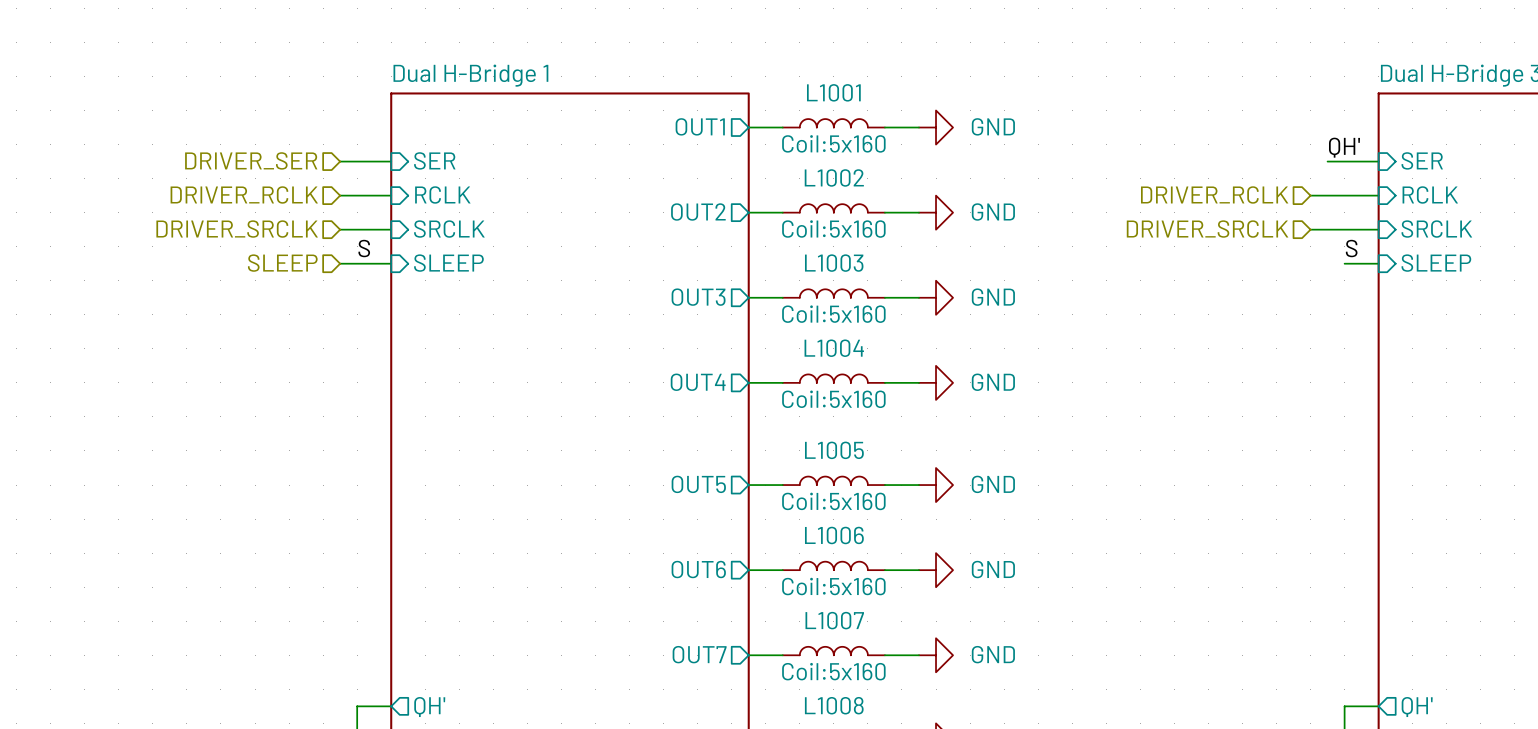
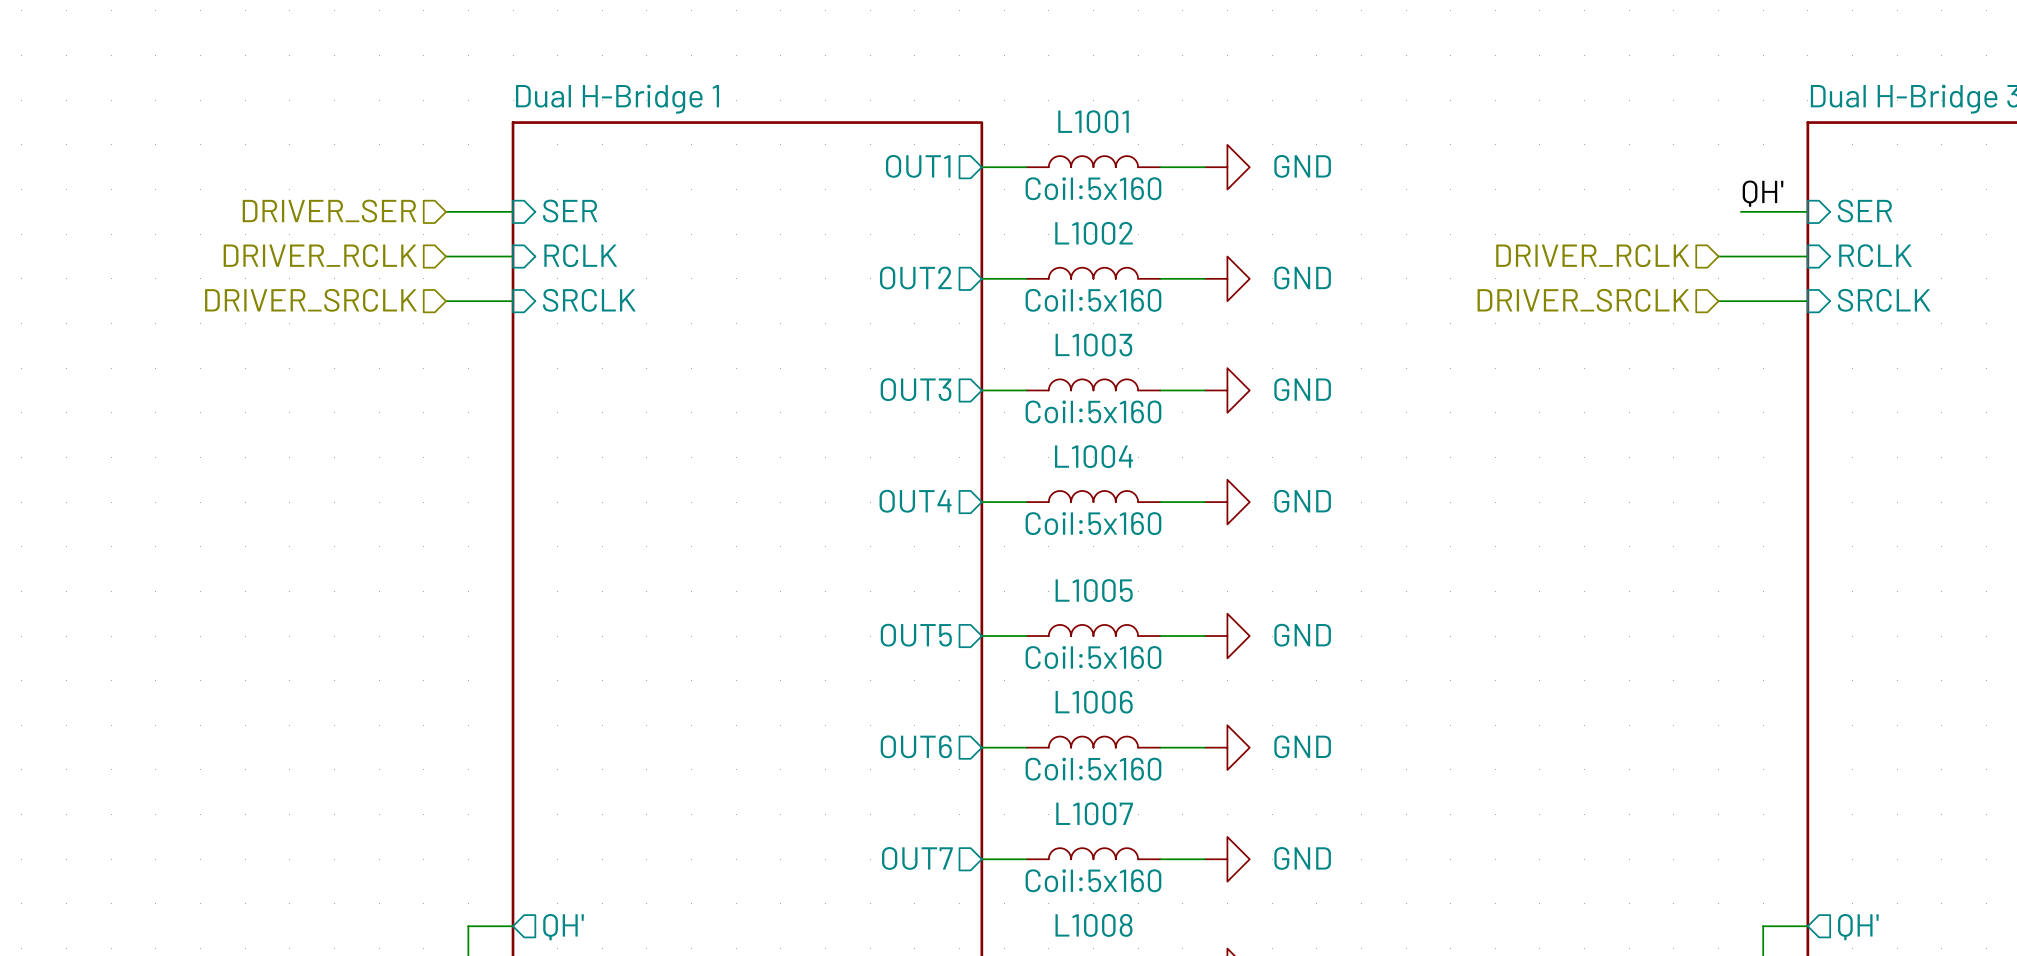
label: S (364, 248) -> none
label: S (1351, 248) -> none
hierarchical label: SLEEP (282, 263) -> none
wire: (340, 263) (391, 263) -> none
sheet pin: SLEEP (448, 263) -> none
wire: (1344, 263) (1378, 263) -> none
sheet pin: SLEEP (1436, 263) -> none

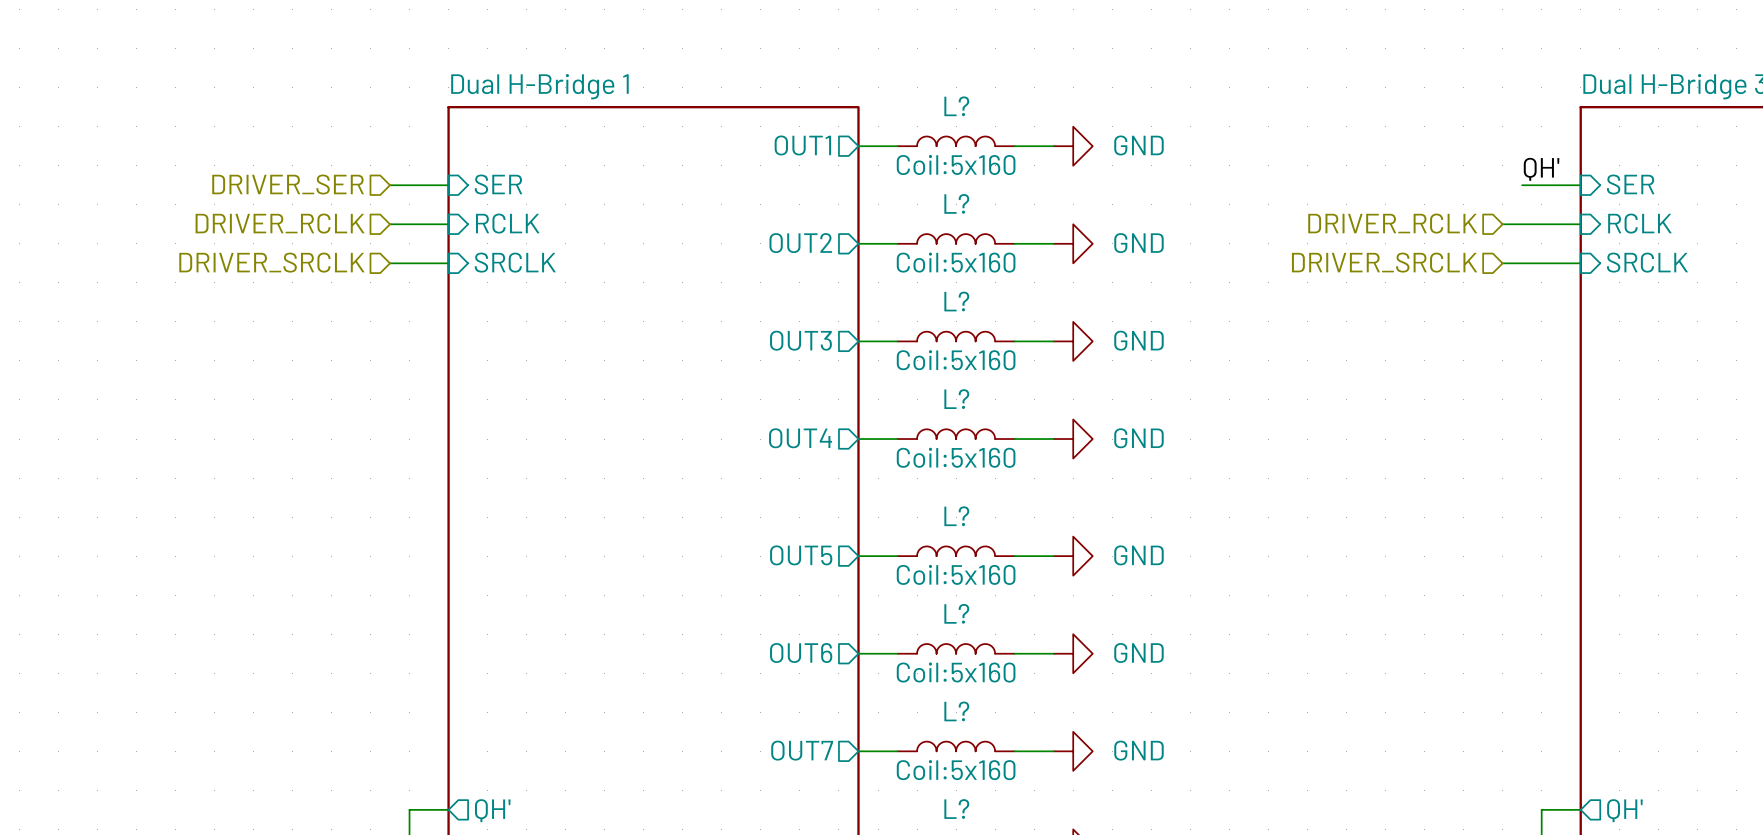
L1001 name: L1001 (1093, 121) -> L? (956, 106)
L1002 name: L1002 (1094, 233) -> L? (956, 203)
L1003 name: L1003 (1093, 344) -> L? (956, 301)
L1004 name: L1004 (1093, 456) -> L? (956, 399)
L1005 name: L1005 (1094, 590) -> L? (956, 516)
L1006 name: L1006 (1094, 702) -> L? (956, 613)
L1007 name: L1007 (1094, 813) -> L? (956, 711)
L1008 name: L1008 (1093, 925) -> L? (956, 809)

